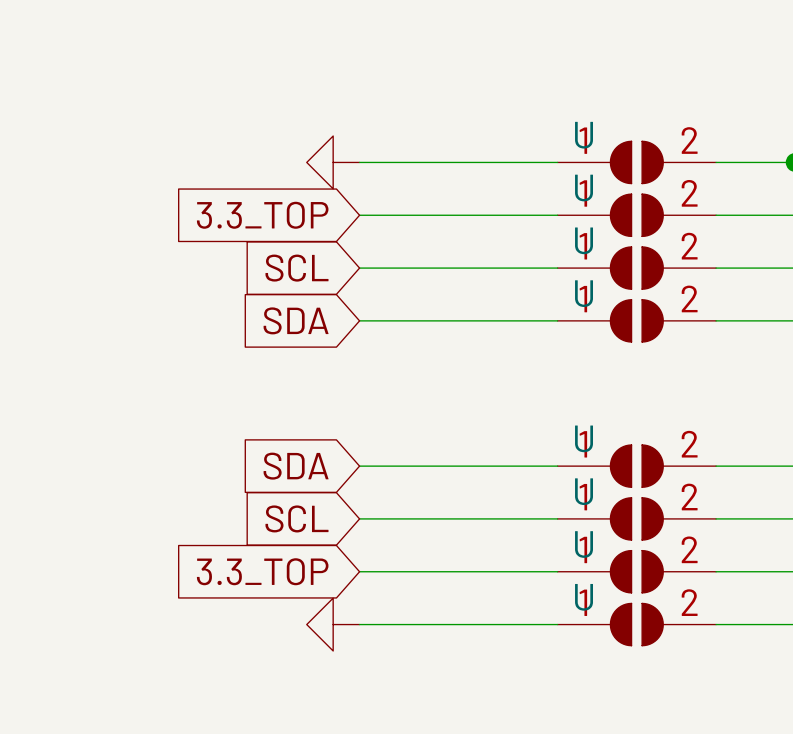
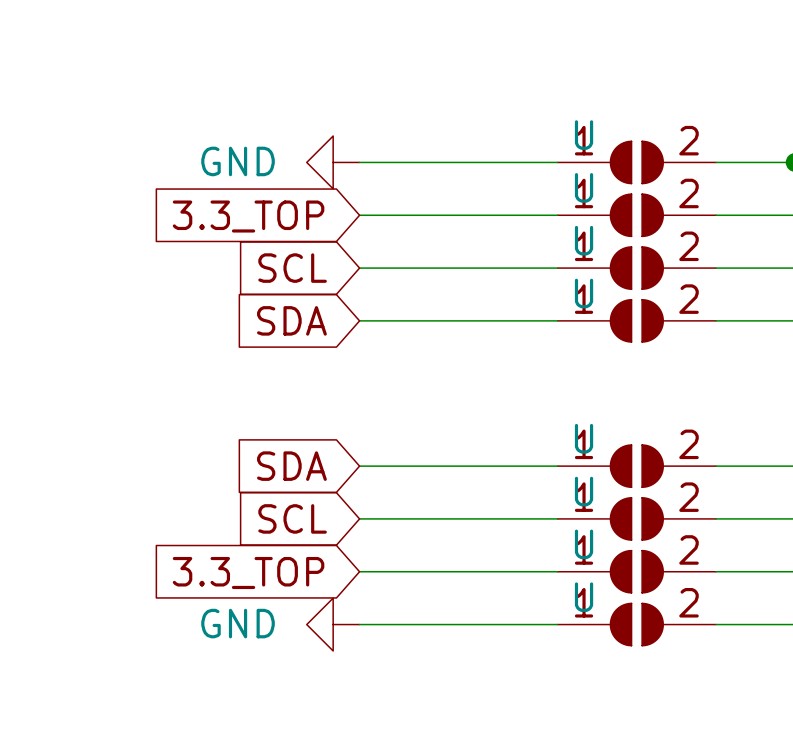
power symbol text: none -> GND (238, 161)
power symbol text: none -> GND (238, 623)

